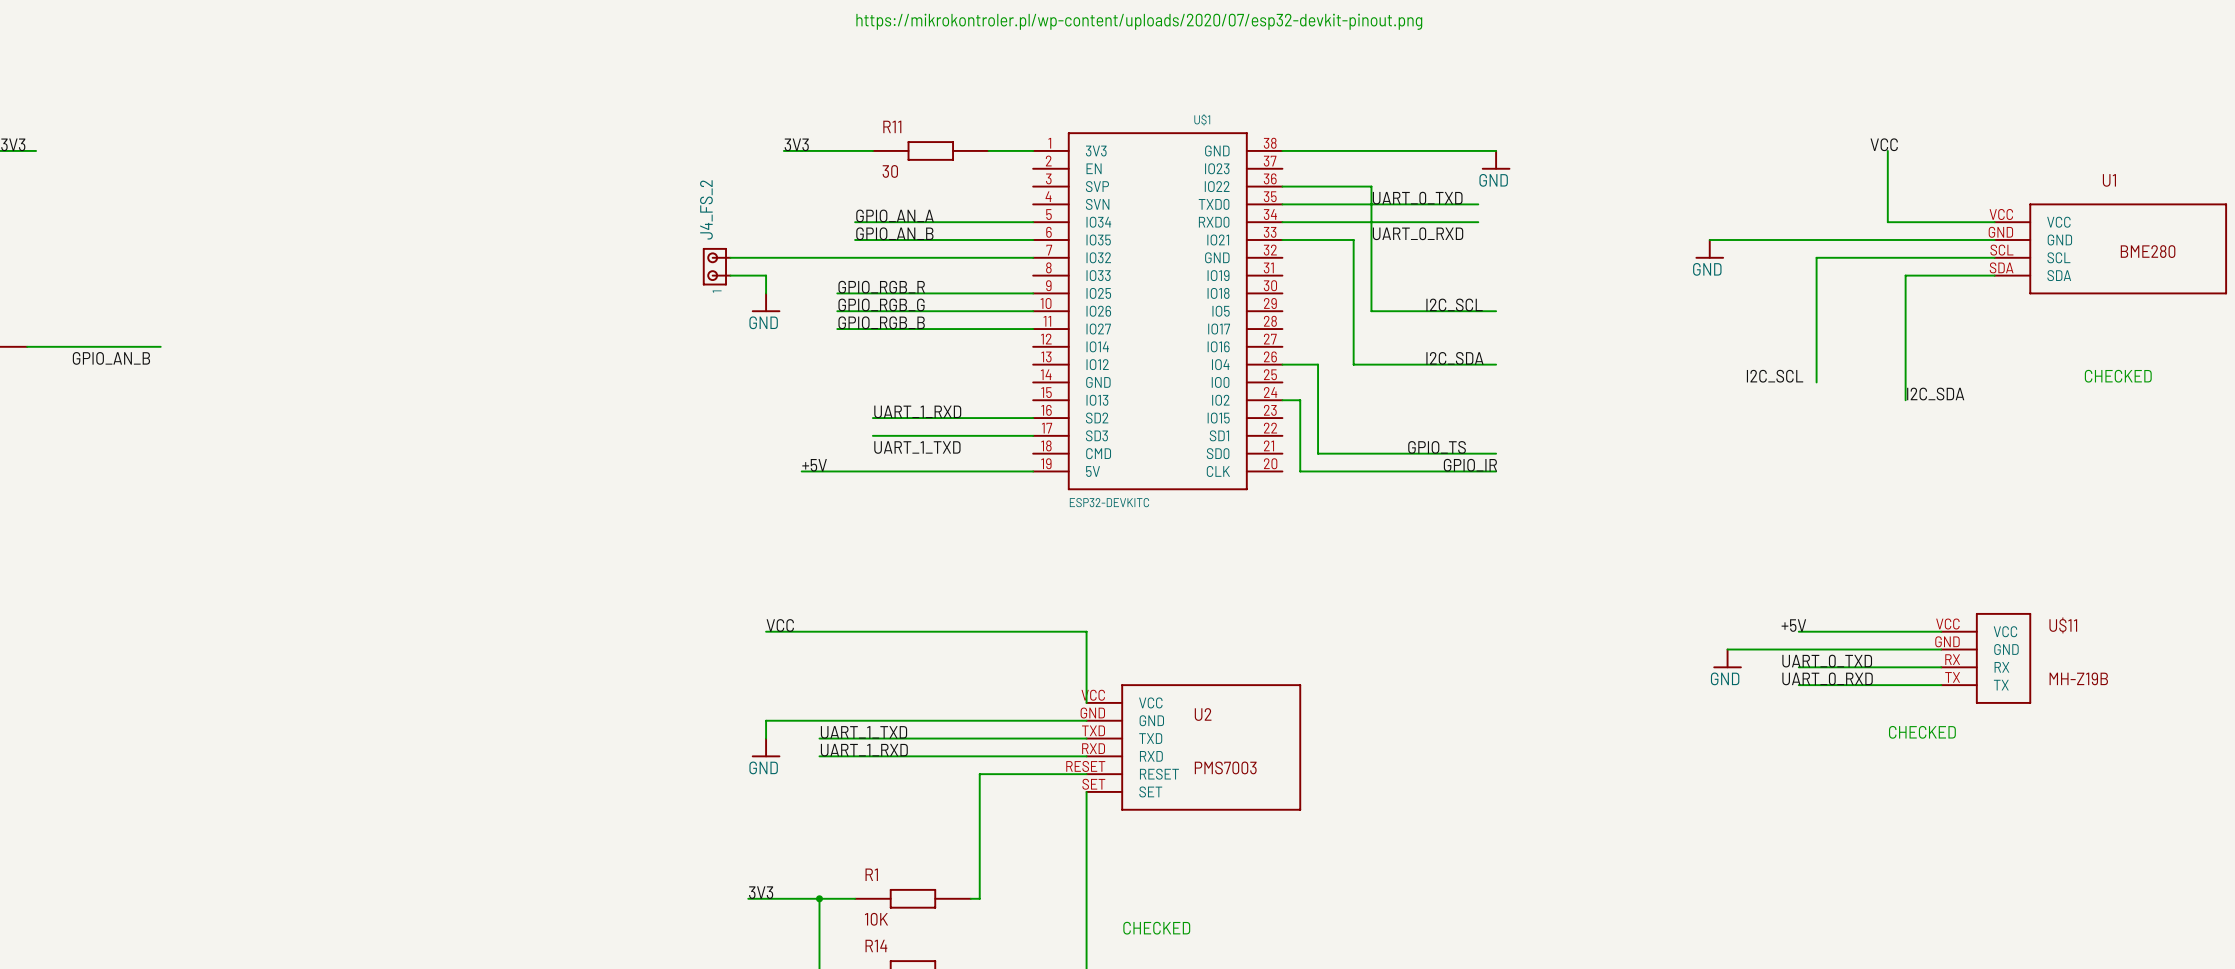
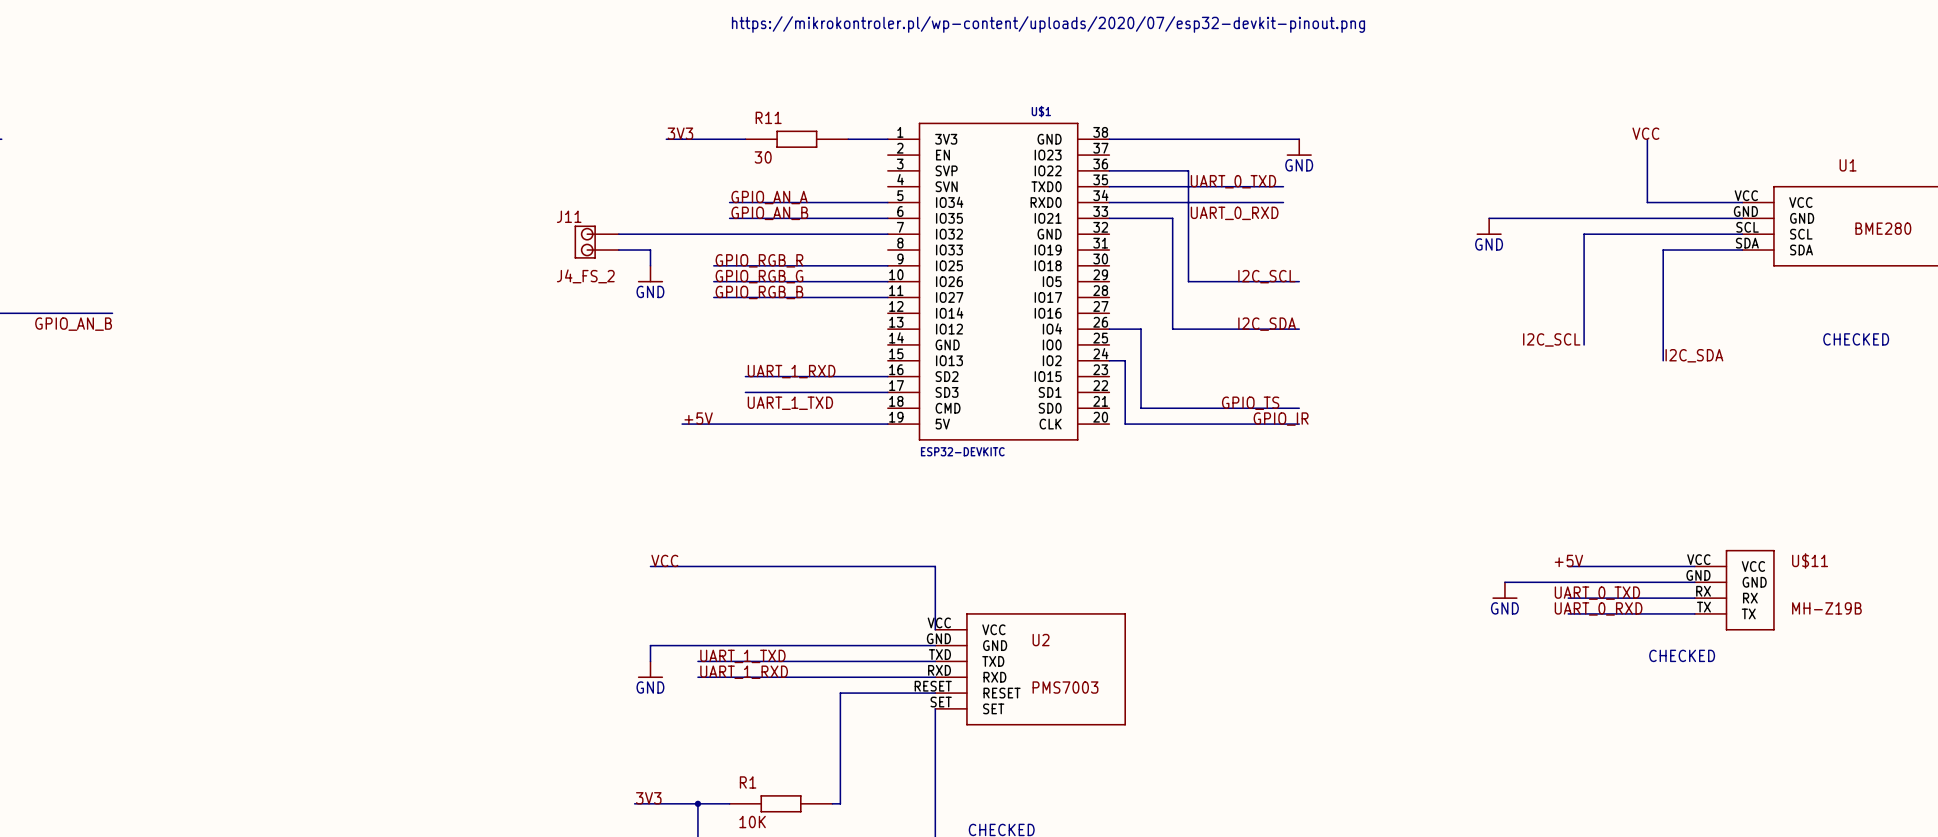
J11: none -> J4_FS_2 (596, 242)
J4_FS_2: (716, 266) -> none

